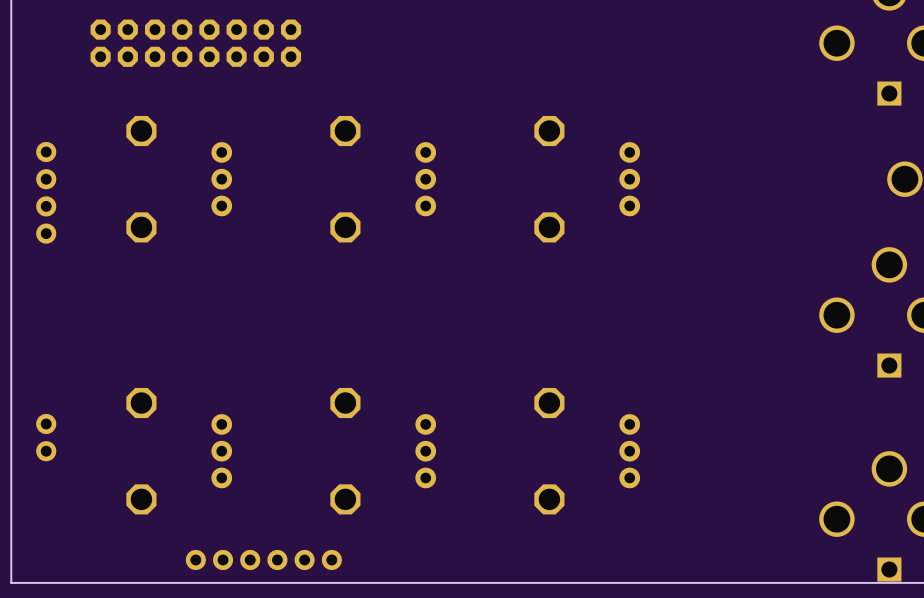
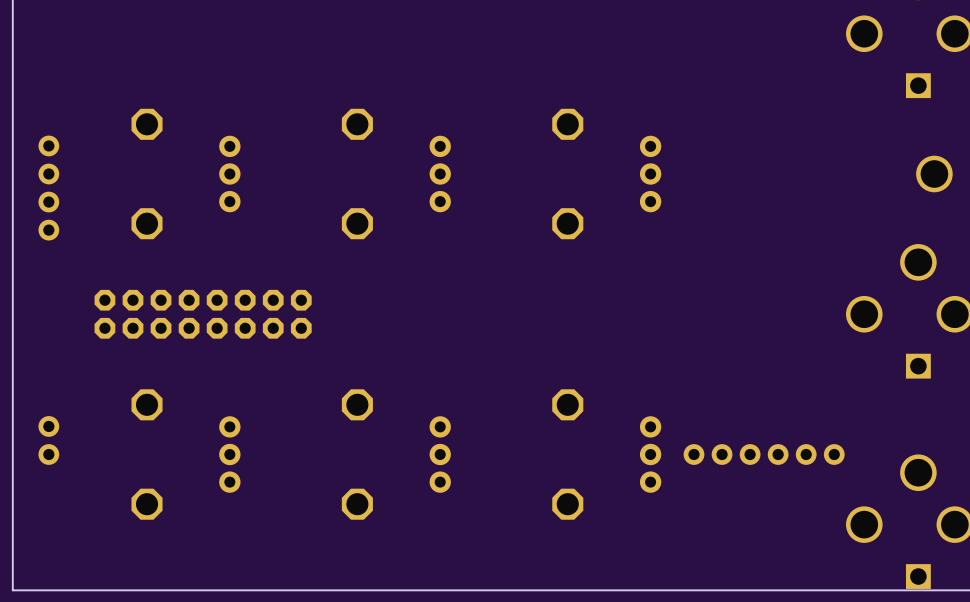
part: (195, 43) -> none
part: none -> (203, 314)
part: none -> (764, 454)
part: (263, 559) -> none

